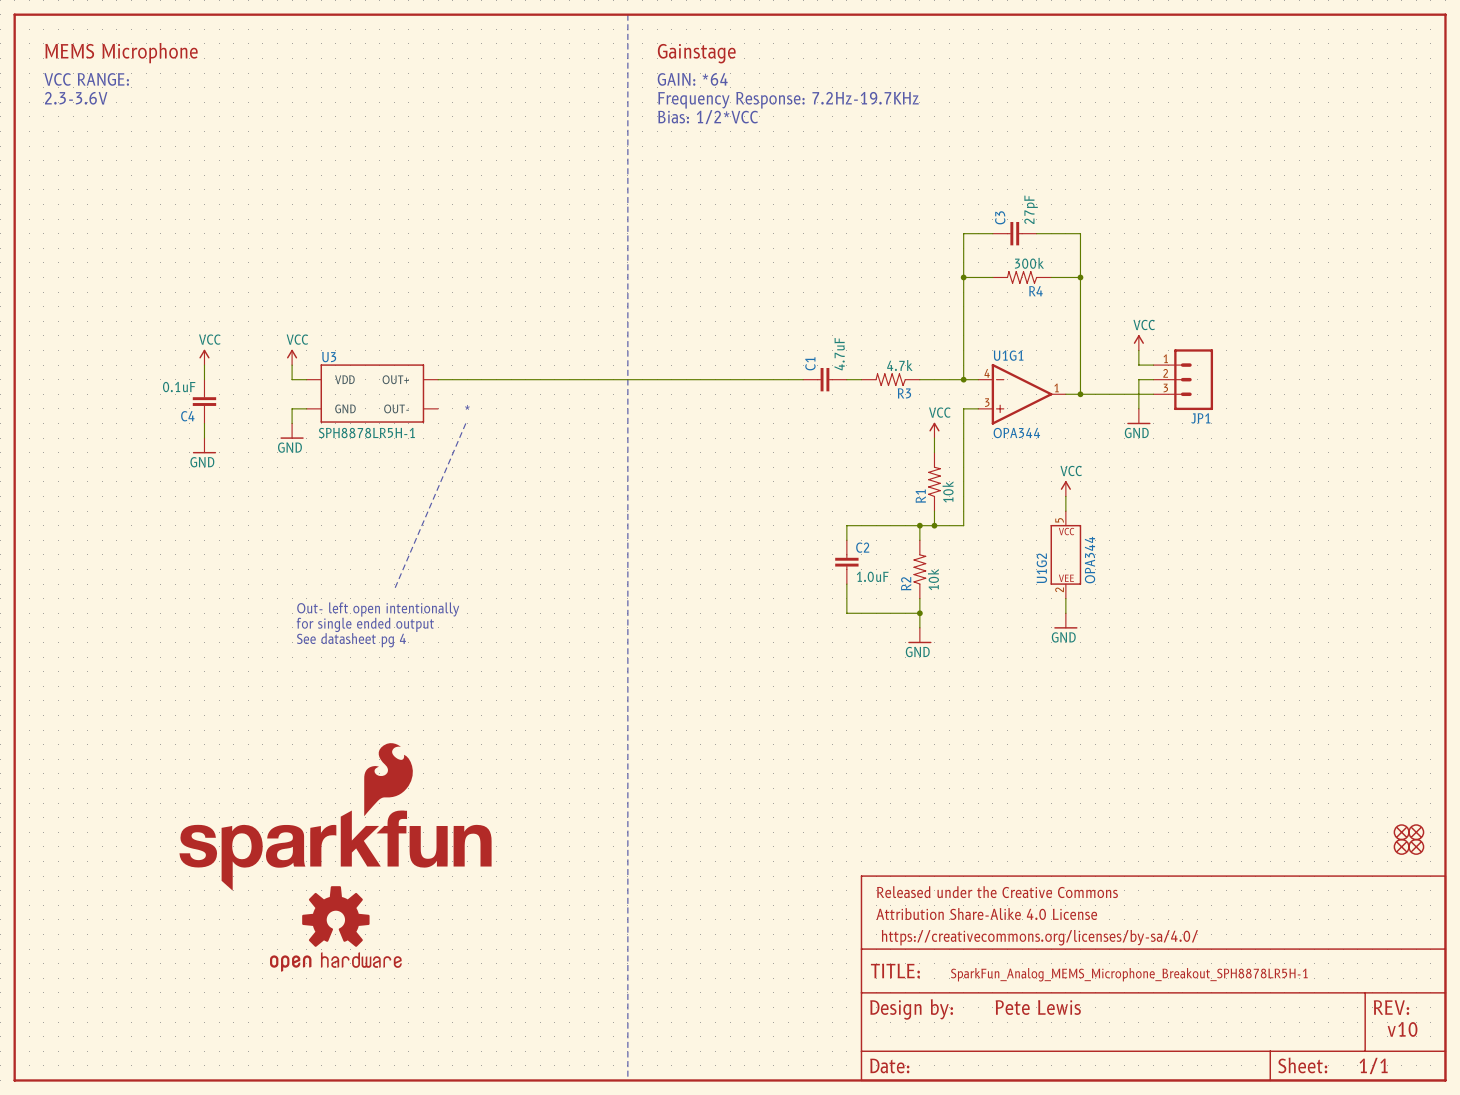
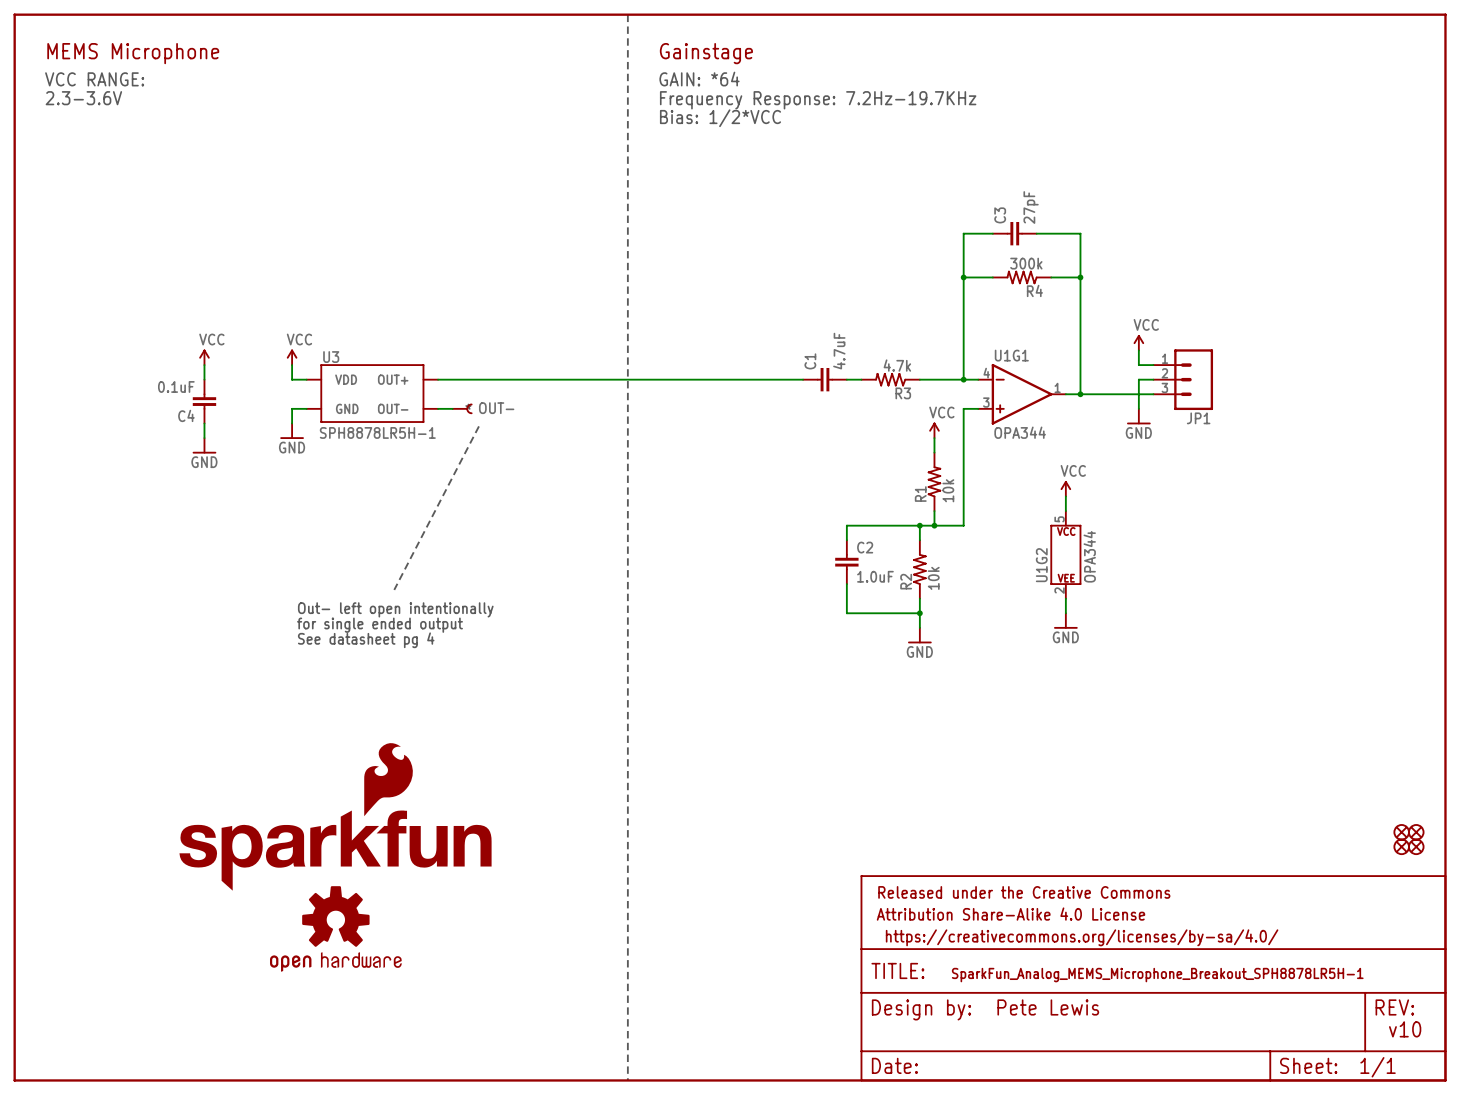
wire: none -> (438, 408) (452, 408)
OUT-: none -> (462, 408)
line: (465, 423) (394, 589) -> (478, 426) (394, 589)

